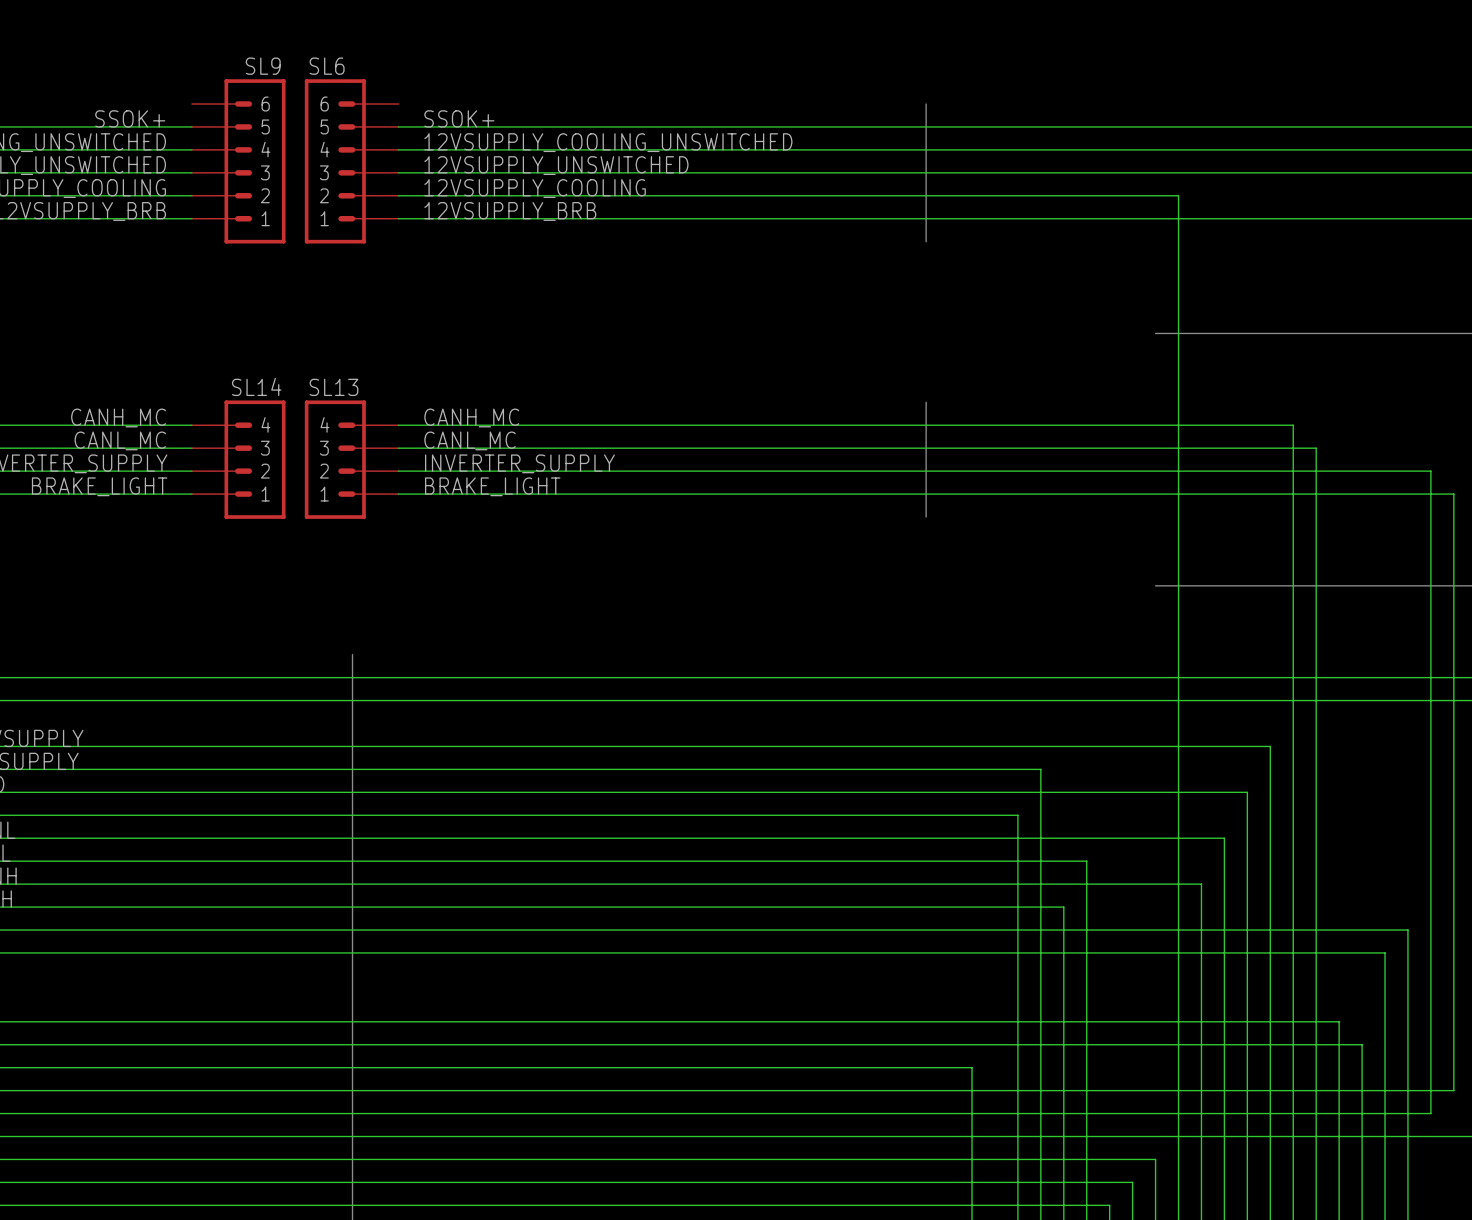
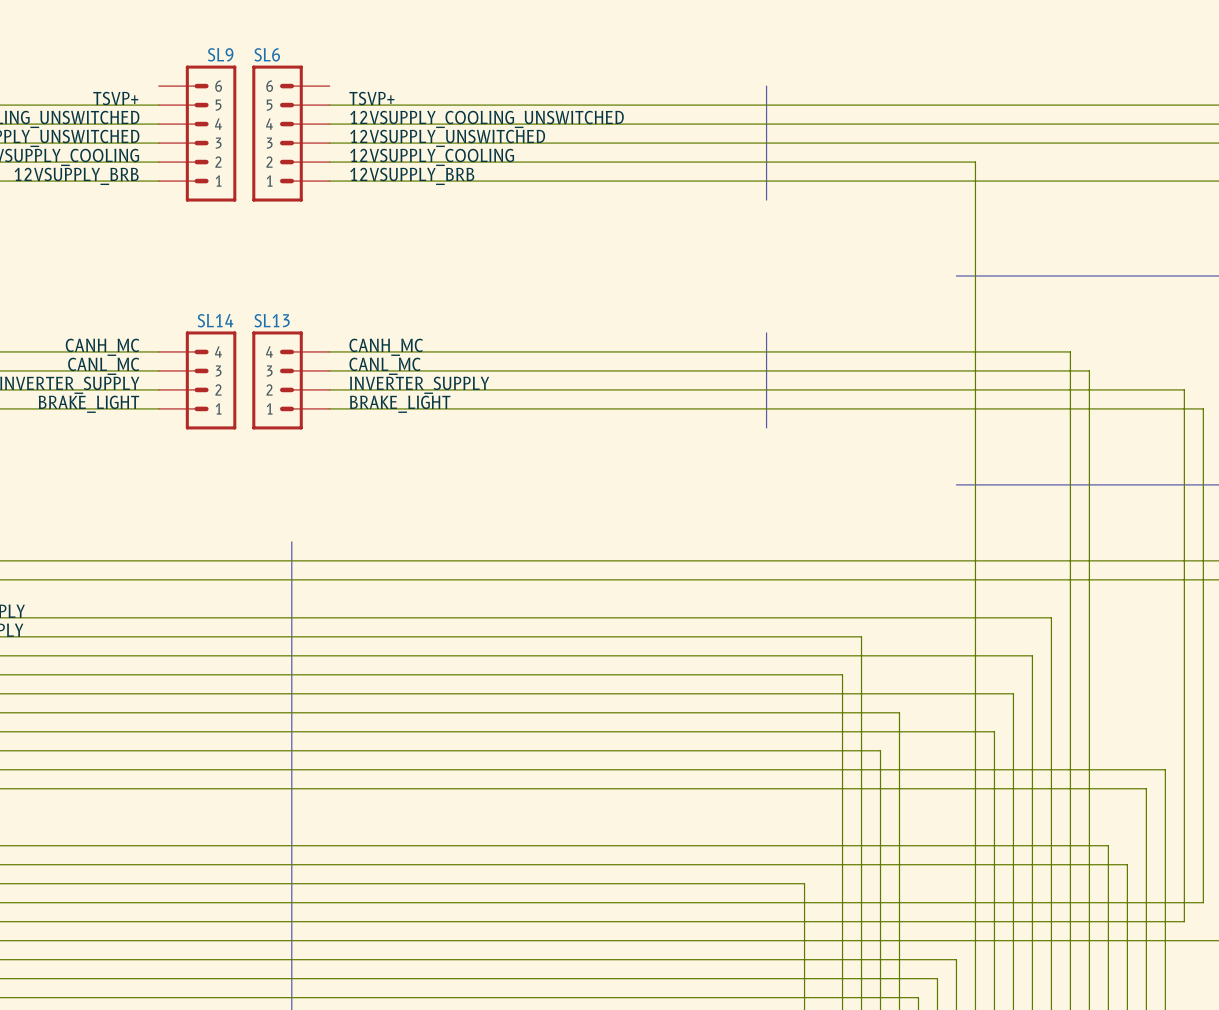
label: SSOK+ (130, 118) -> TSVP+ (115, 98)
label: SSOK+ (459, 118) -> TSVP+ (371, 98)

